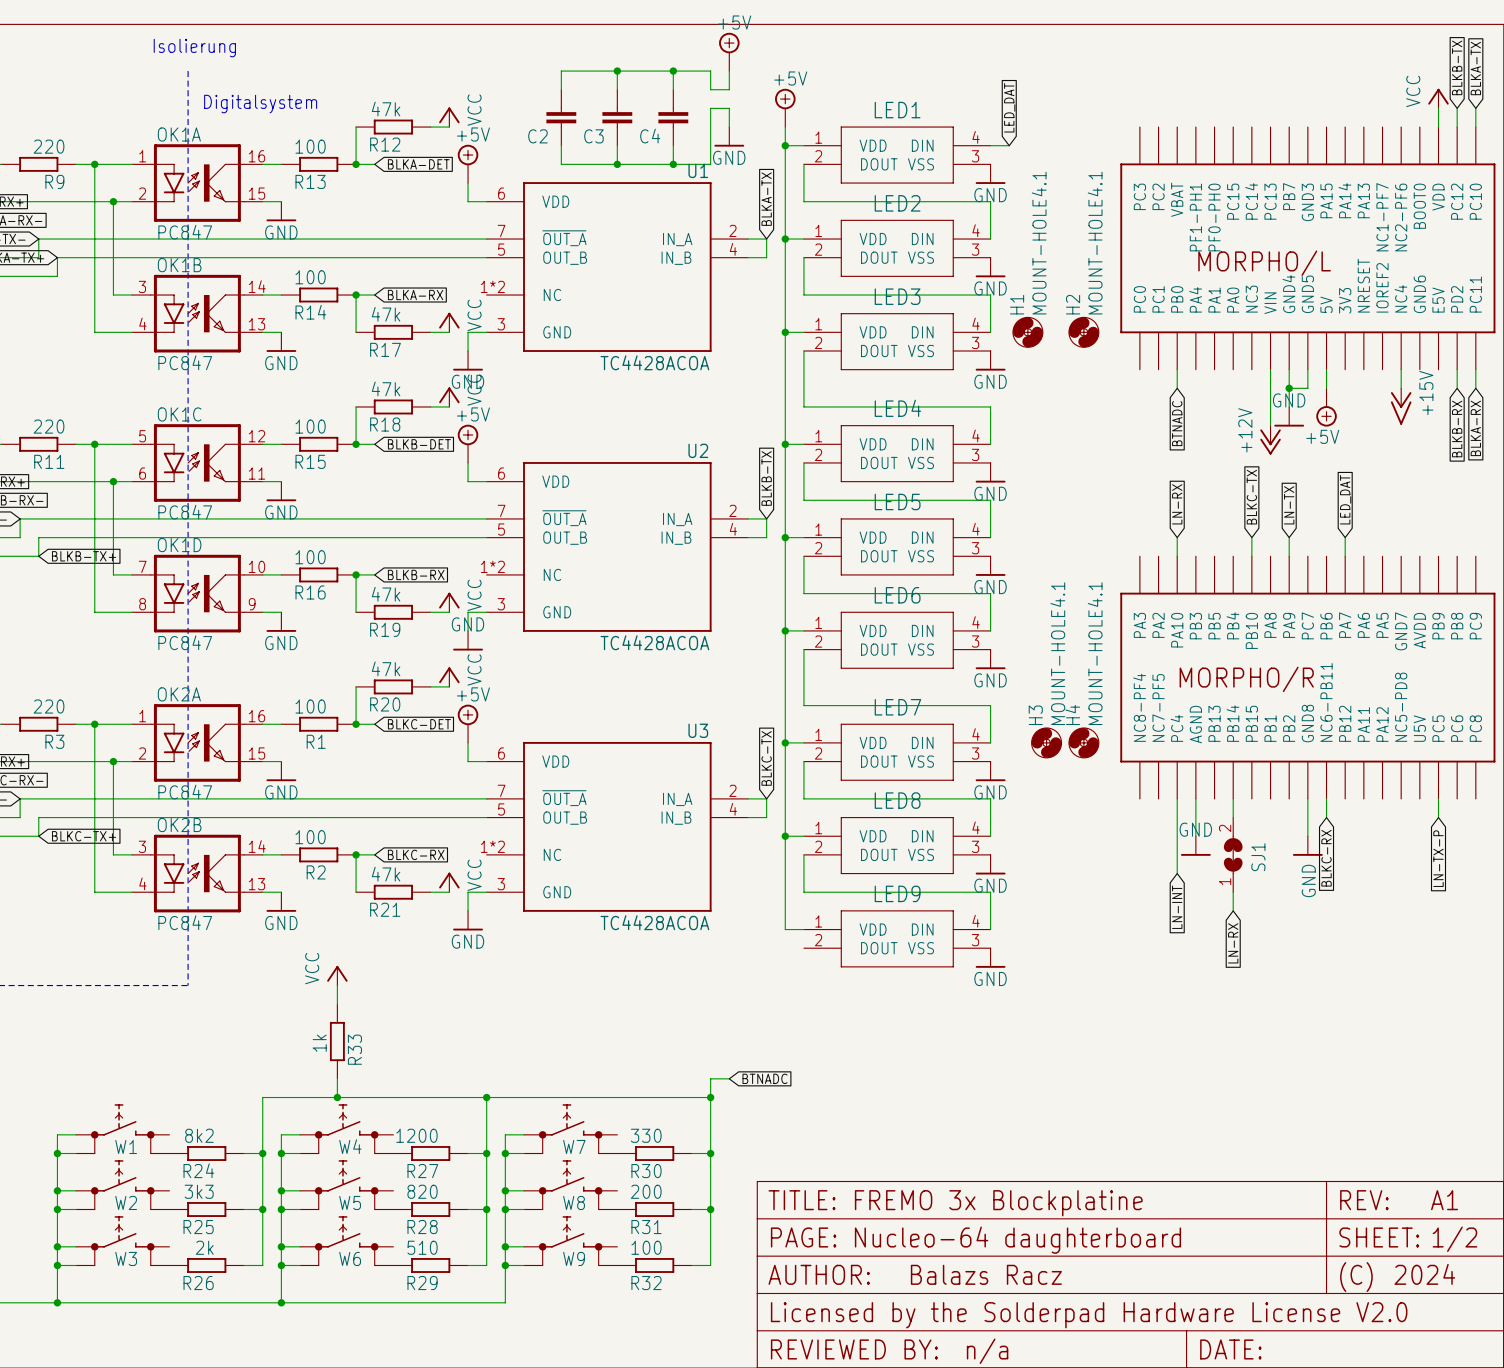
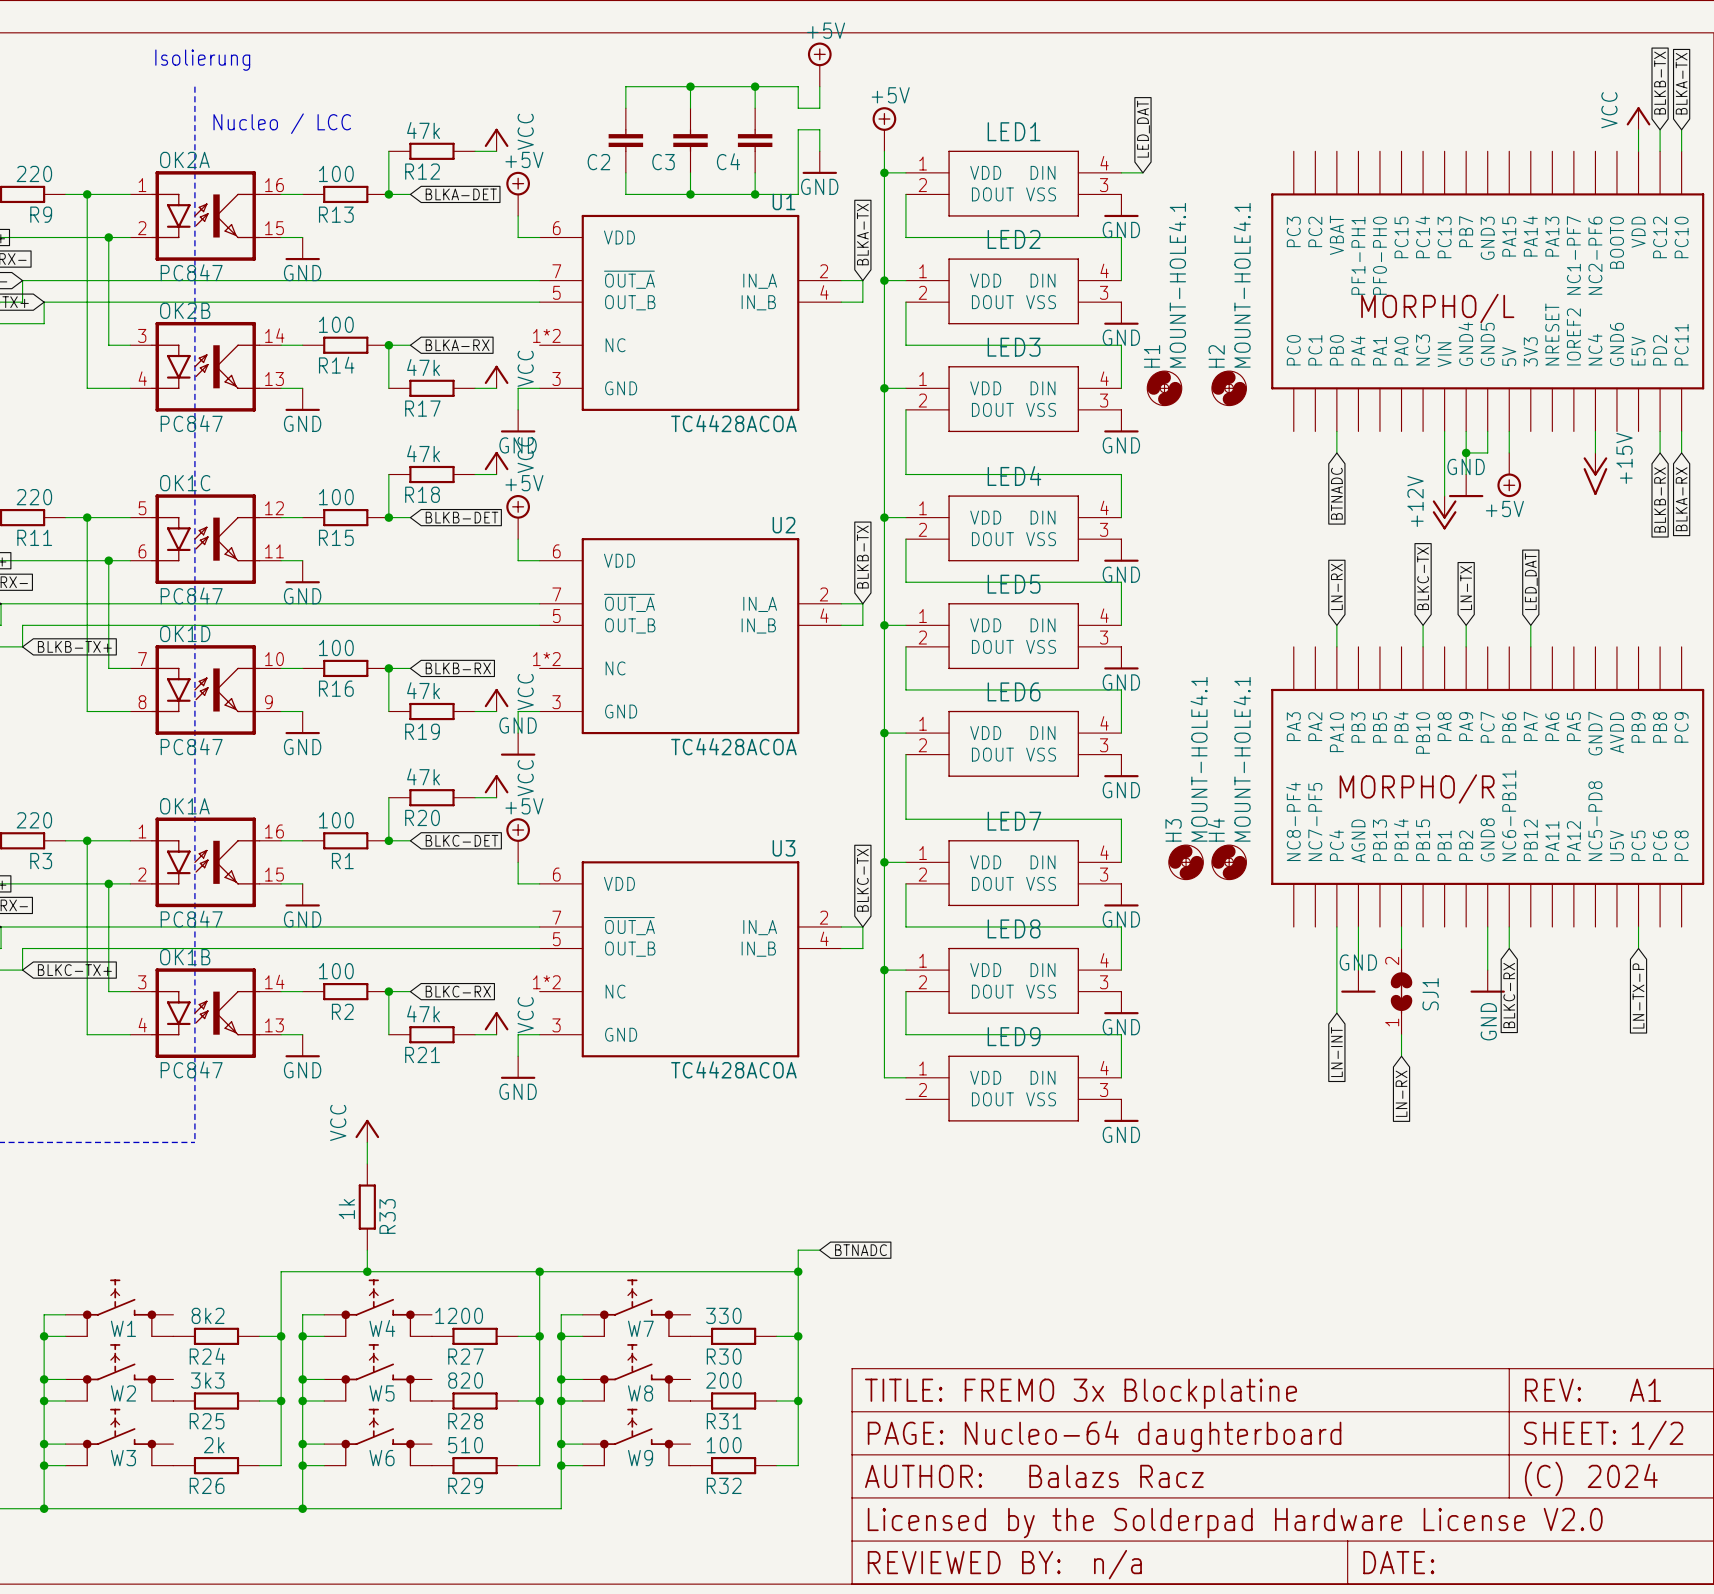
text: Digitalsystem (260, 104) -> Nucleo / LCC (282, 123)
OK1A name: OK1A (179, 134) -> OK2A (184, 159)
OK1B name: OK1B (179, 265) -> OK2B (185, 310)
OK2A name: OK2A (179, 694) -> OK1A (184, 806)
OK2B name: OK2B (179, 825) -> OK1B (185, 957)

